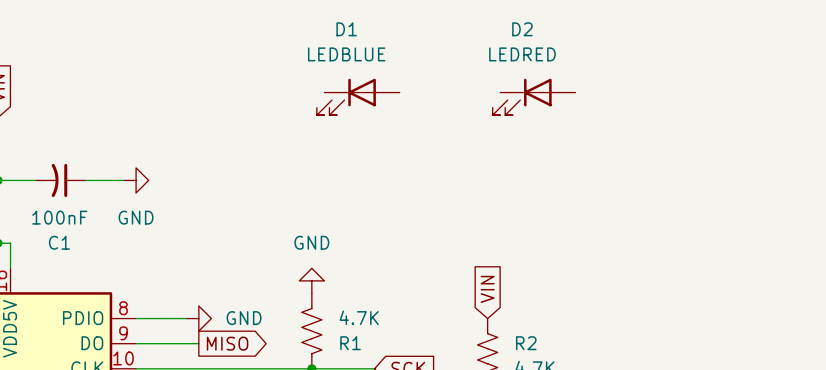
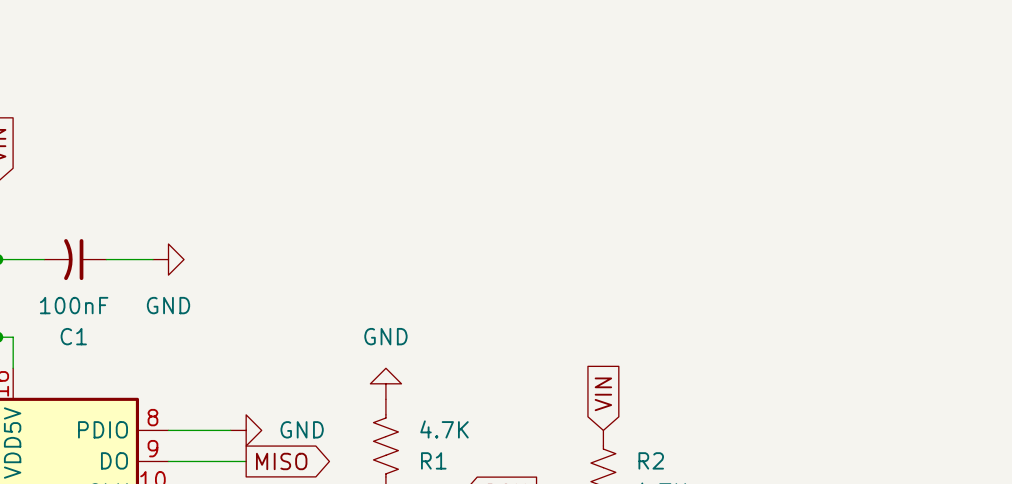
D1: LEDBLUE (358, 96) -> none
D2: LEDRED (534, 96) -> none

